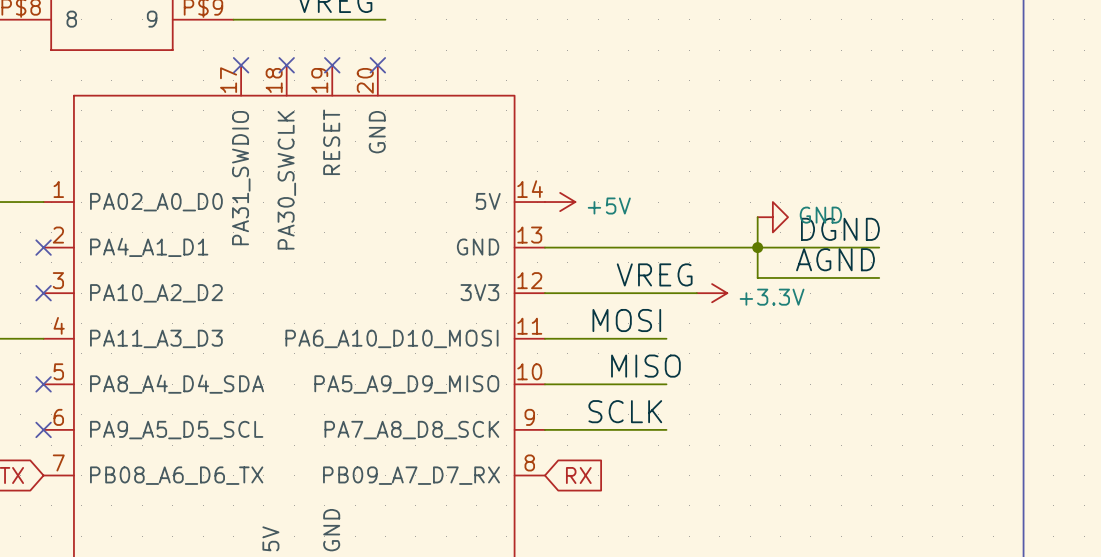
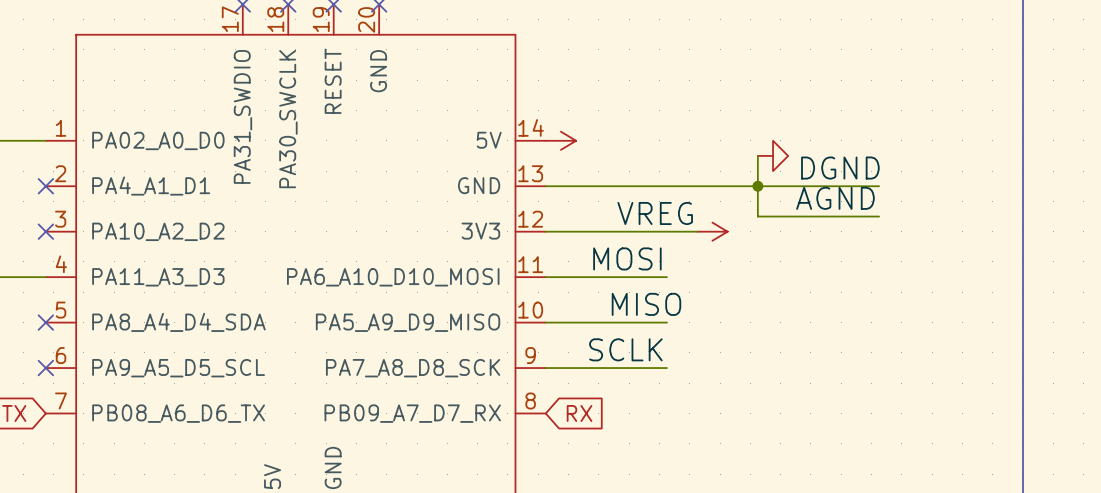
power symbol text: +5V (609, 206) -> none
power symbol text: GND (820, 215) -> none
power symbol text: +3.3V (772, 297) -> none

